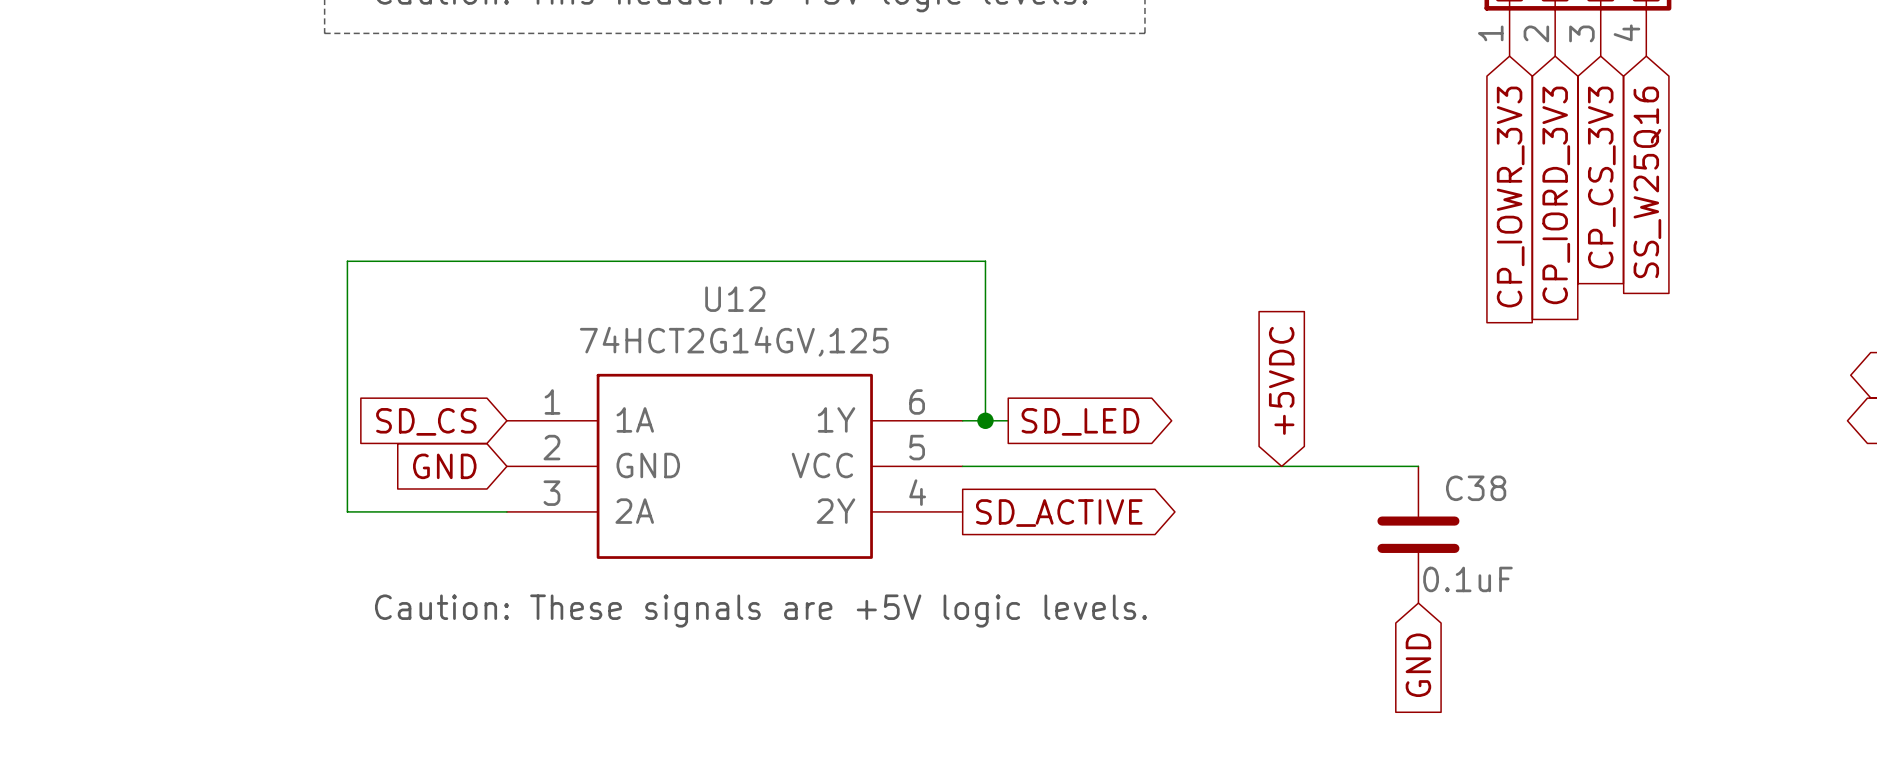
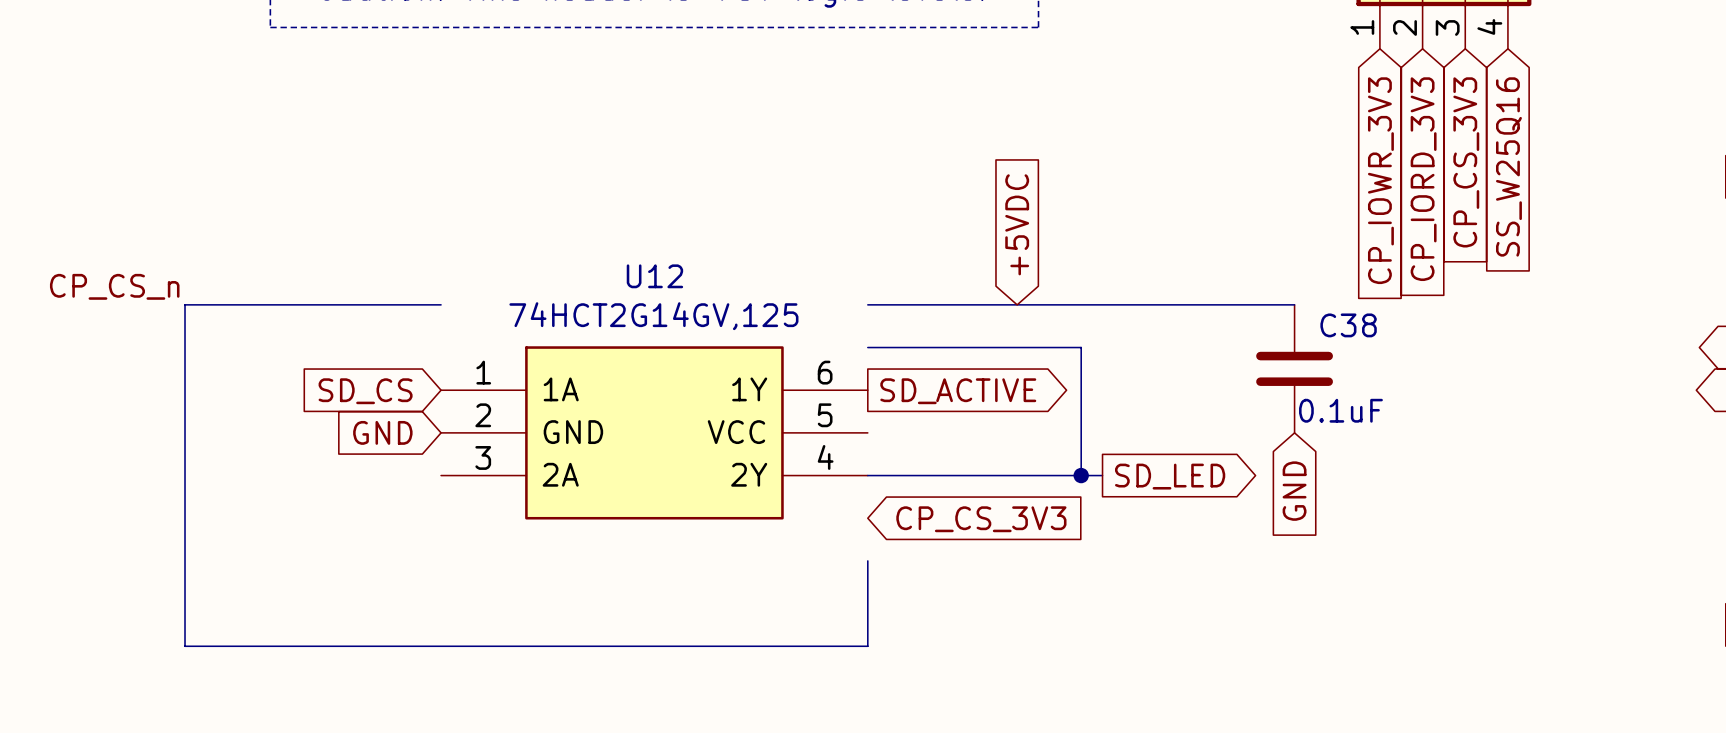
label: none -> CP_CS_n (114, 286)
wire: none -> (441, 304) (185, 304) (185, 646) (867, 646) (867, 560)
wire: none -> (867, 347) (1081, 347) (1081, 475)
global label position: +5VDC (1281, 380) -> +5VDC (1017, 224)
wire: (962, 420) (1008, 420) -> none
wire: (985, 420) (985, 261) (347, 261) (347, 511) (506, 511) -> none
junction: (985, 420) -> none
global label position: SD_LED (1080, 421) -> SD_LED (1170, 476)
wire: (962, 466) (1418, 466) -> (867, 304) (1294, 304)
wire: none -> (867, 475) (1102, 475)
junction: none -> (1081, 475)
global label position: SD_ACTIVE (1059, 513) -> SD_ACTIVE (958, 391)
C38 position: (1418, 534) -> (1294, 368)
global label: none -> CP_CS_3V3 (981, 519)
text: Caution: These signals are +5V logic levels. (761, 611) -> none
global label position: GND (1418, 665) -> GND (1294, 491)

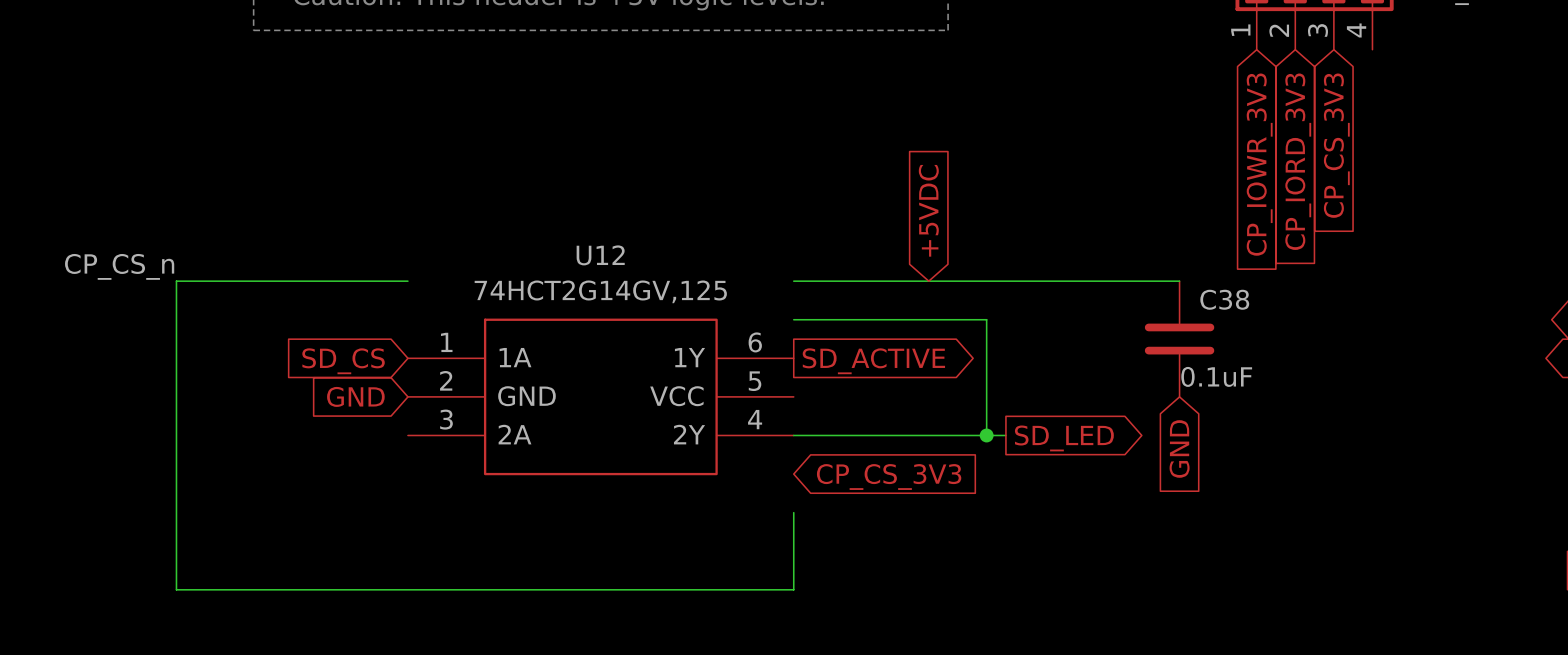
global label: SS_W25Q16 (1508, 166) -> none

